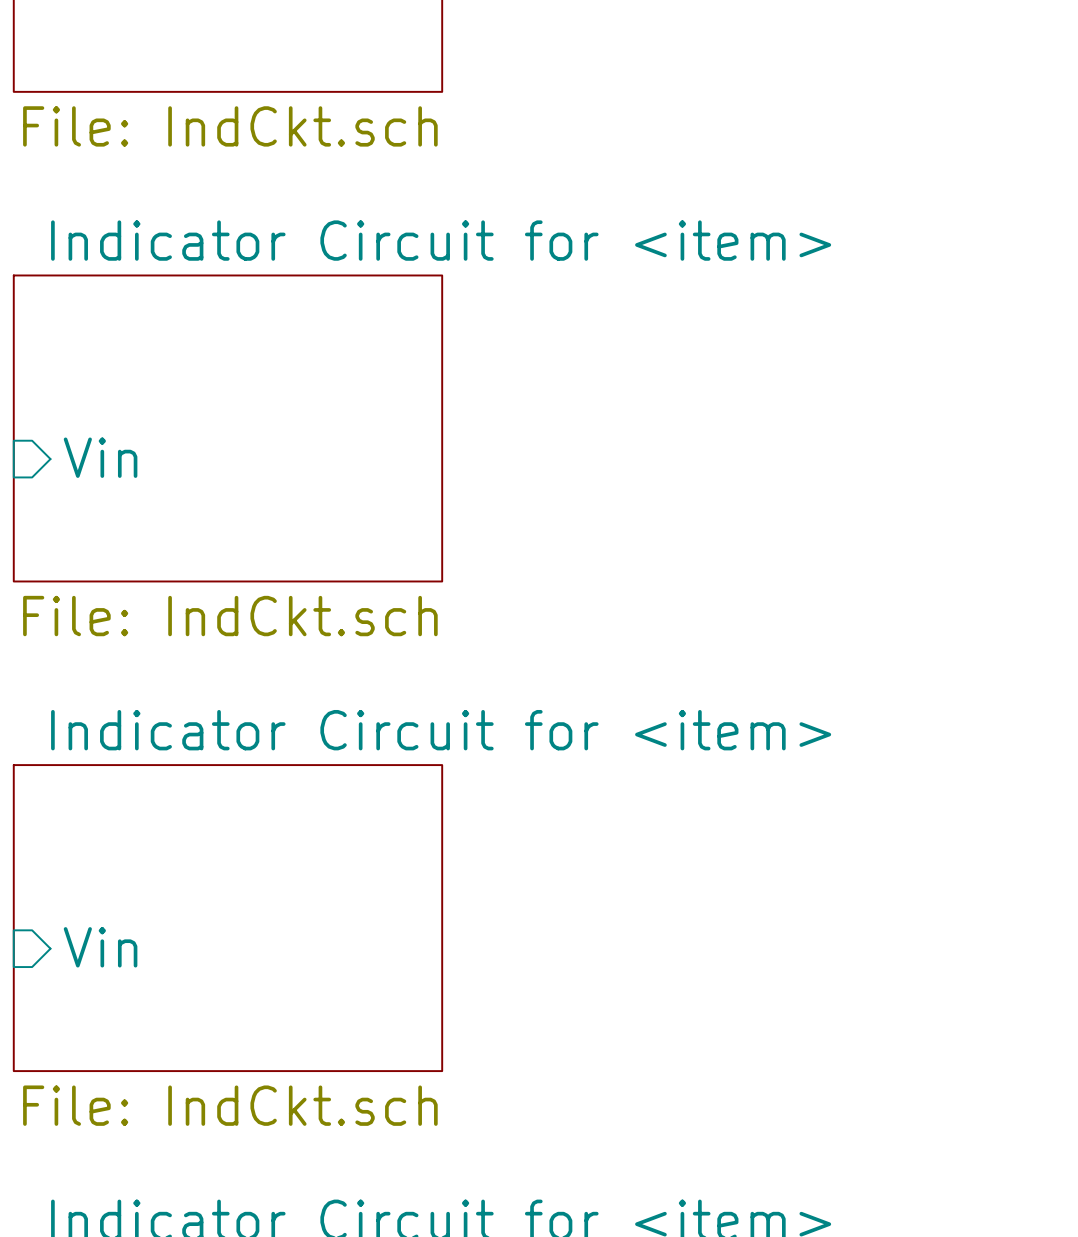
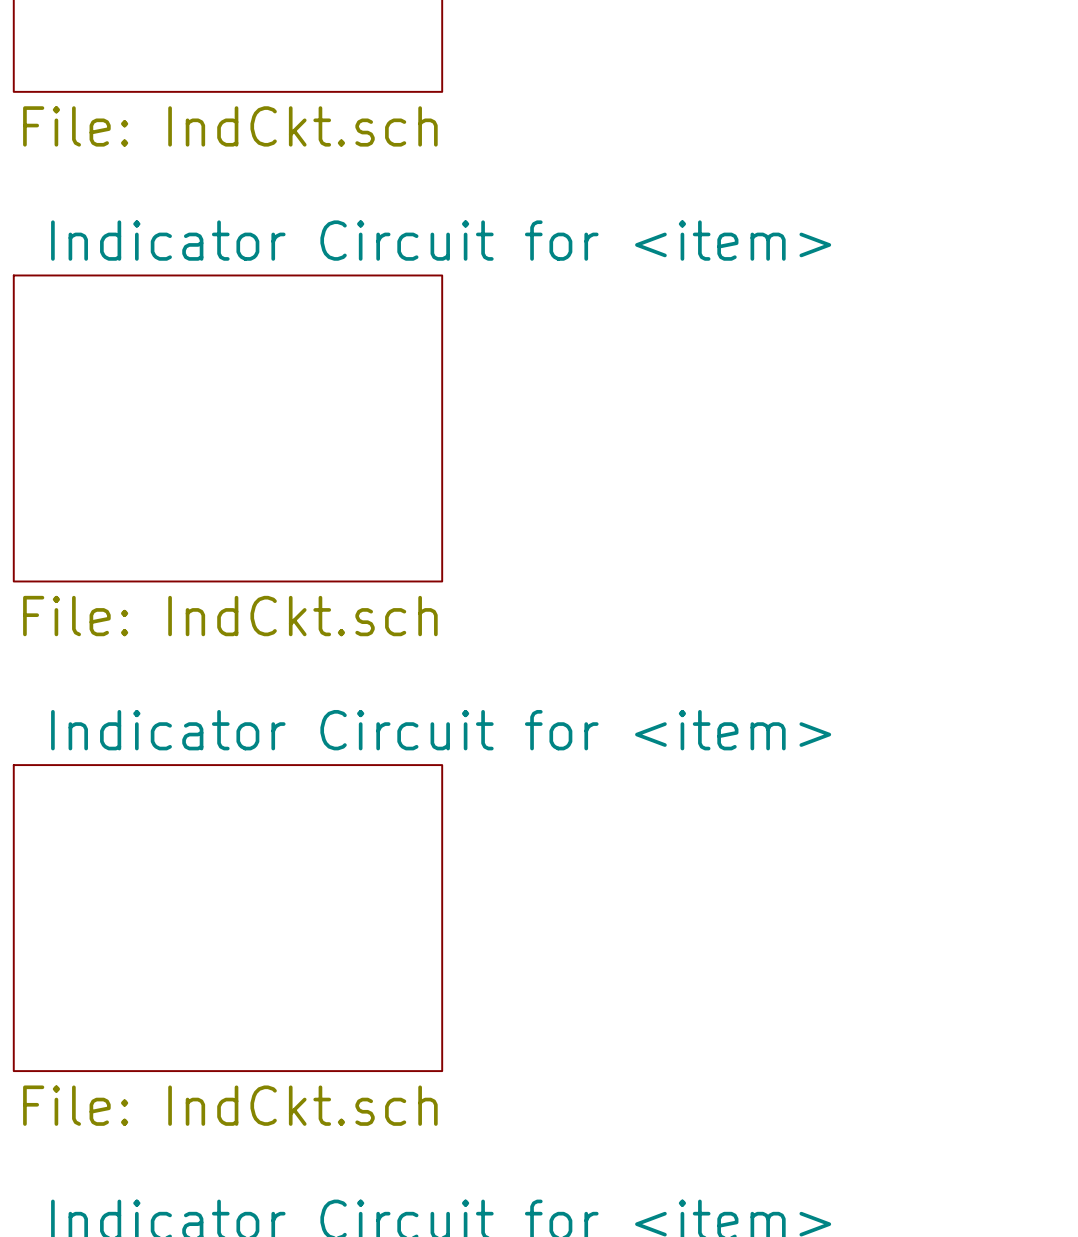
sheet pin: Vin (100, 457) -> none
sheet pin: Vin (100, 947) -> none

